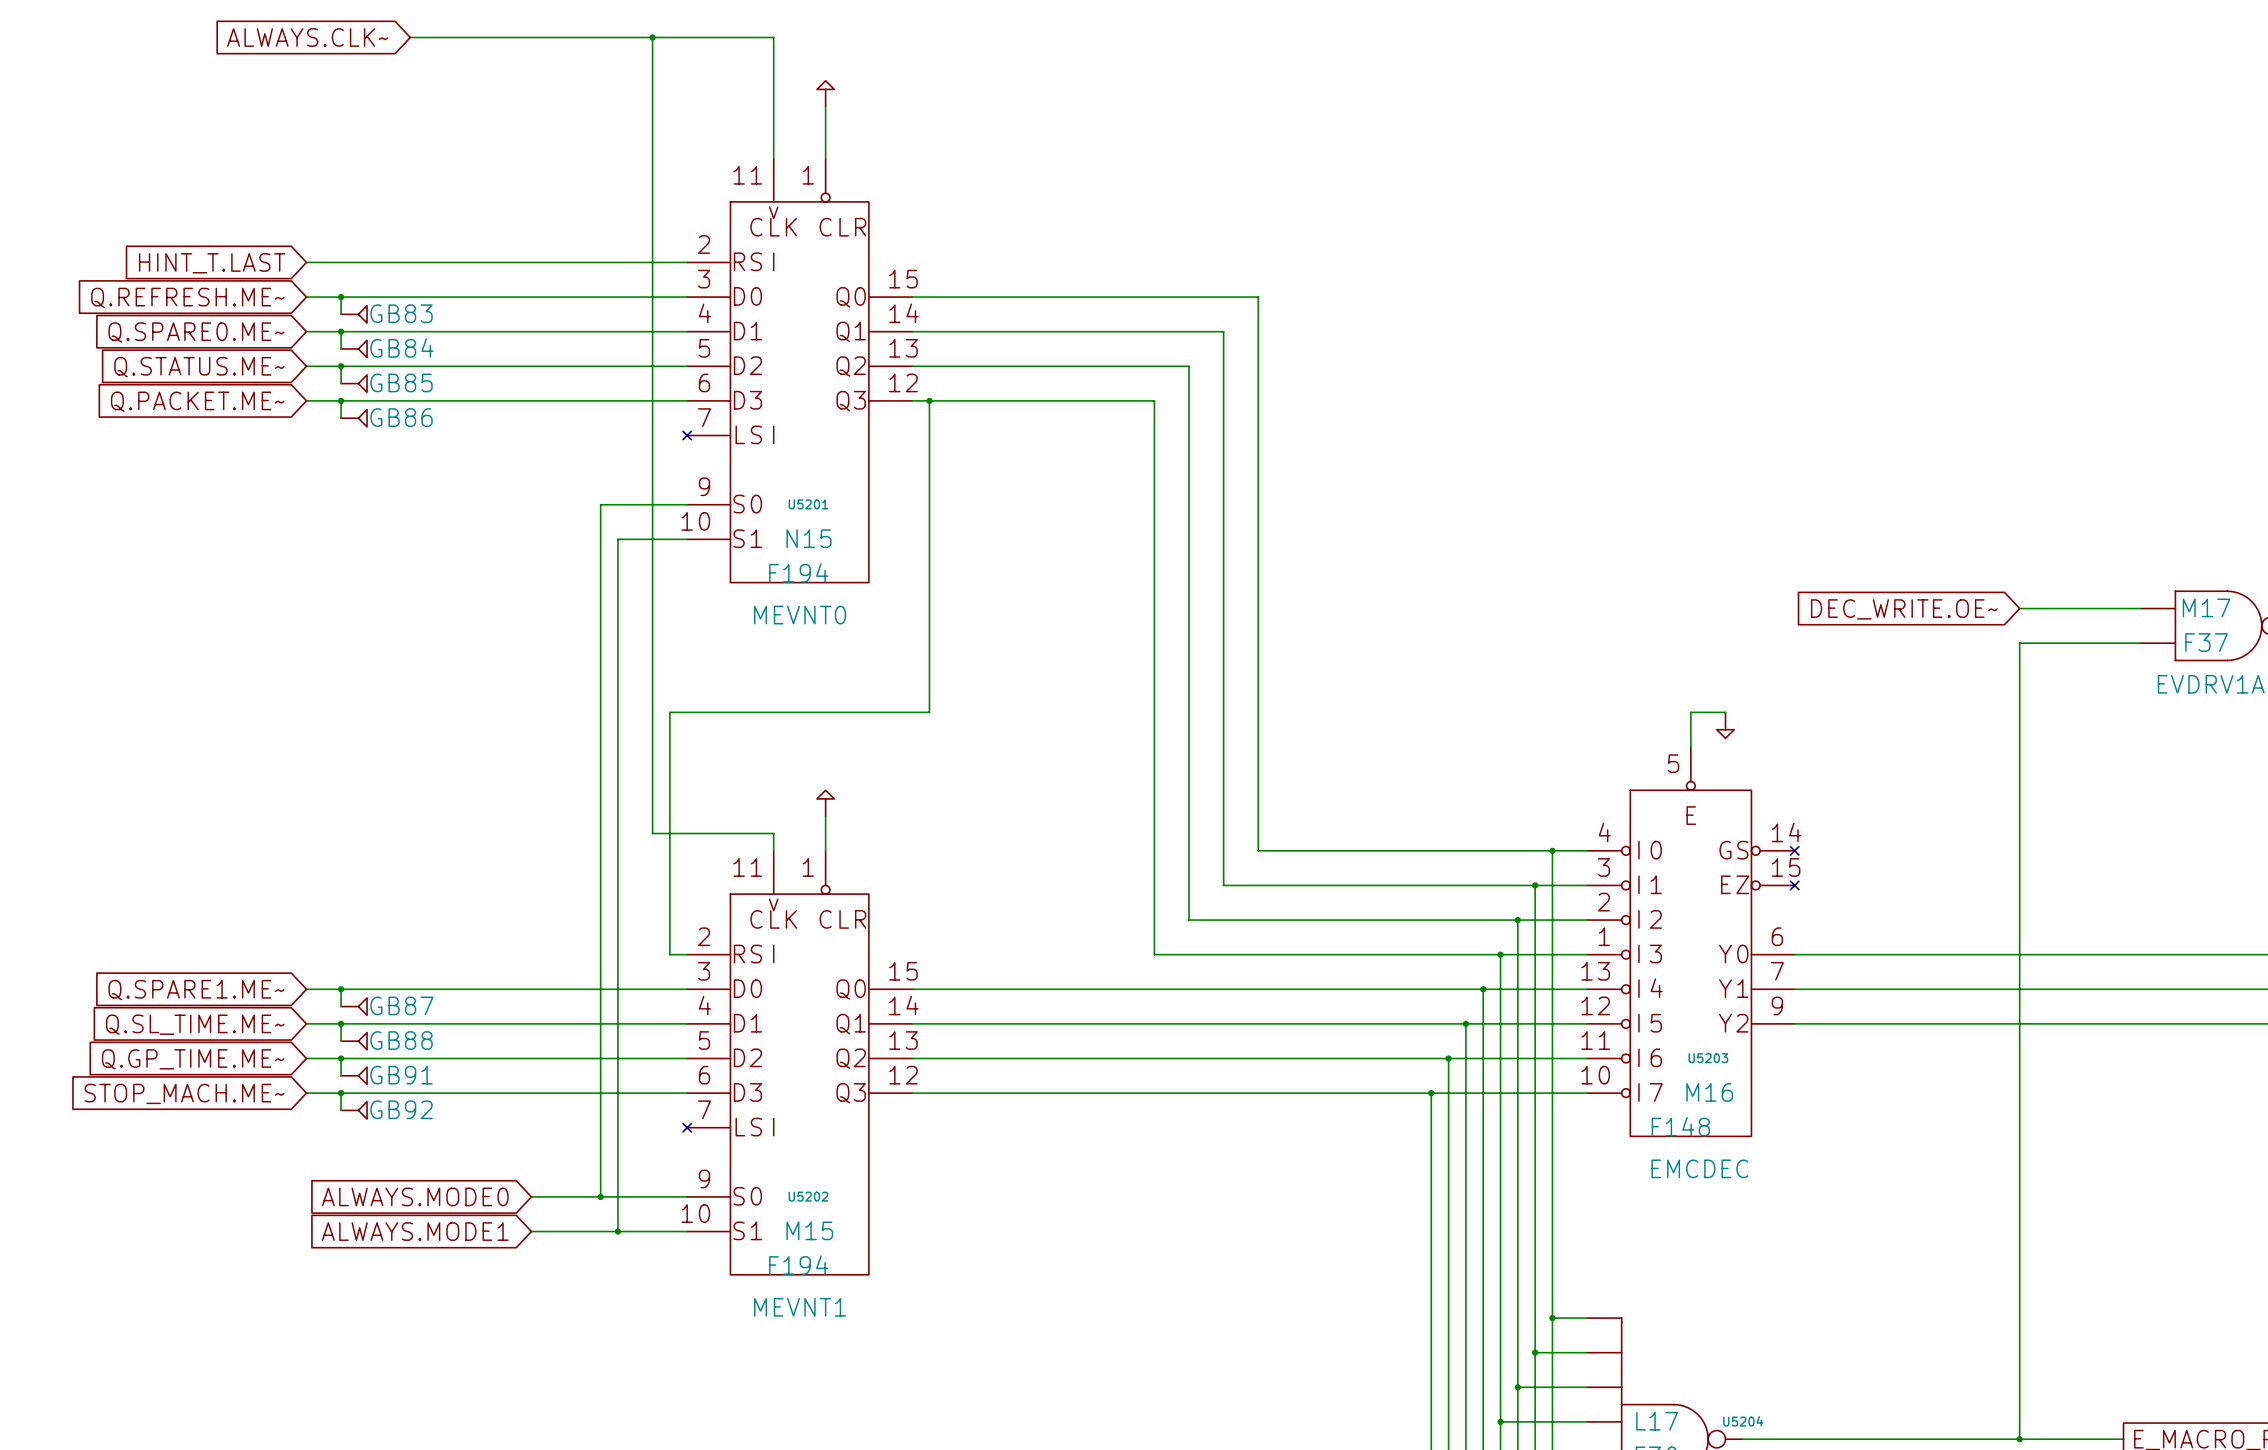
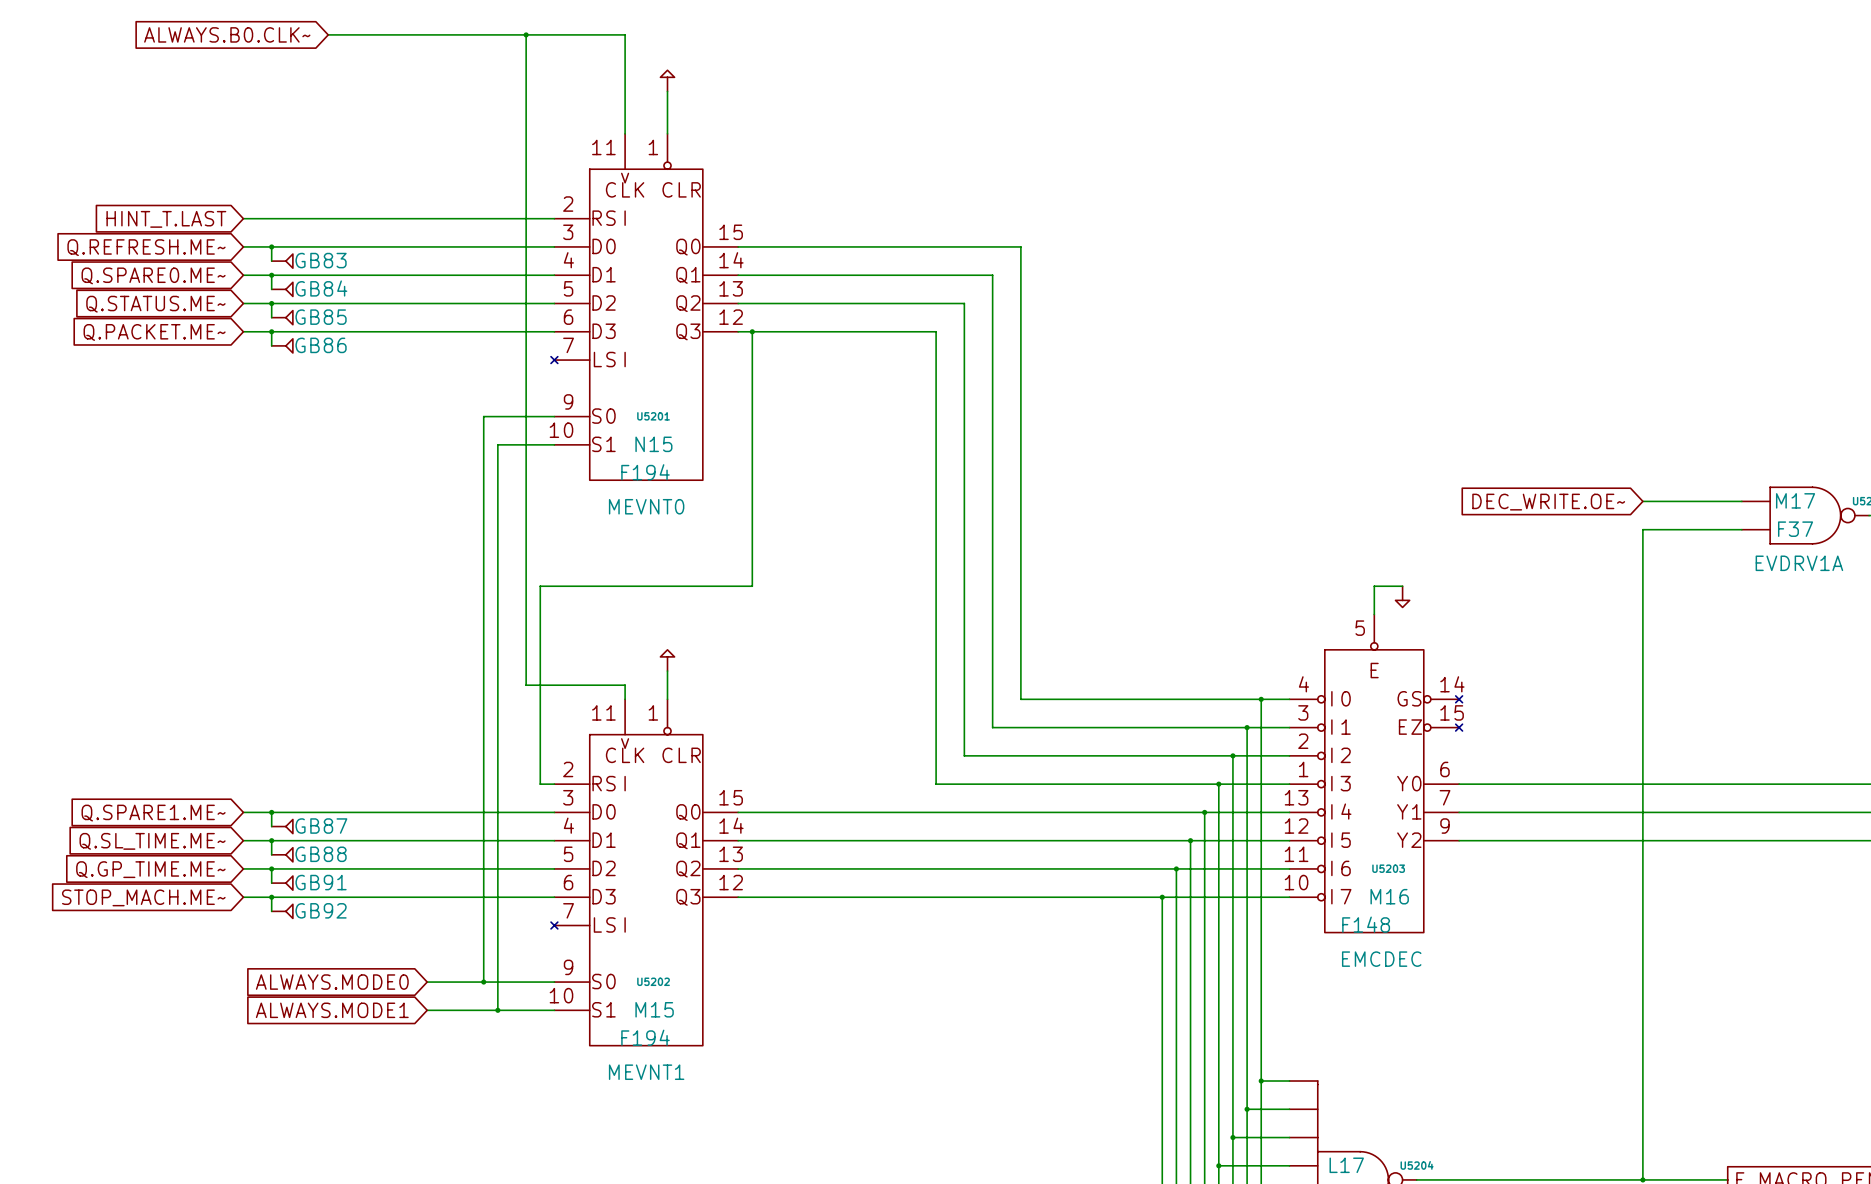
global label: ALWAYS.CLK~ (307, 37) -> ALWAYS.B0.CLK~ (227, 34)

